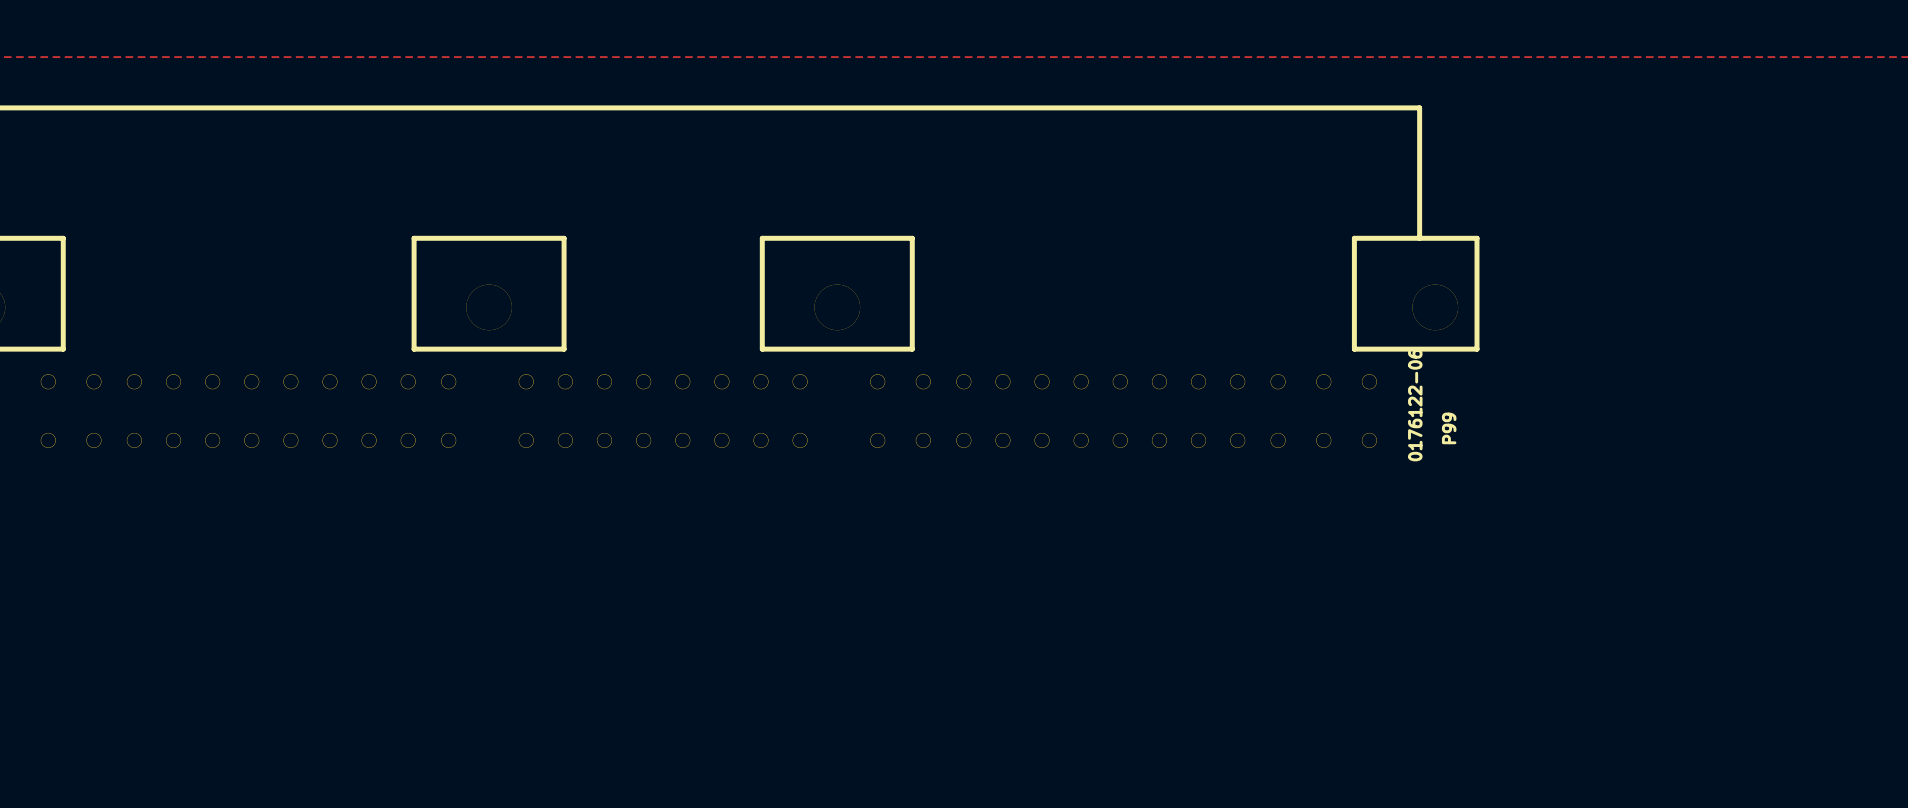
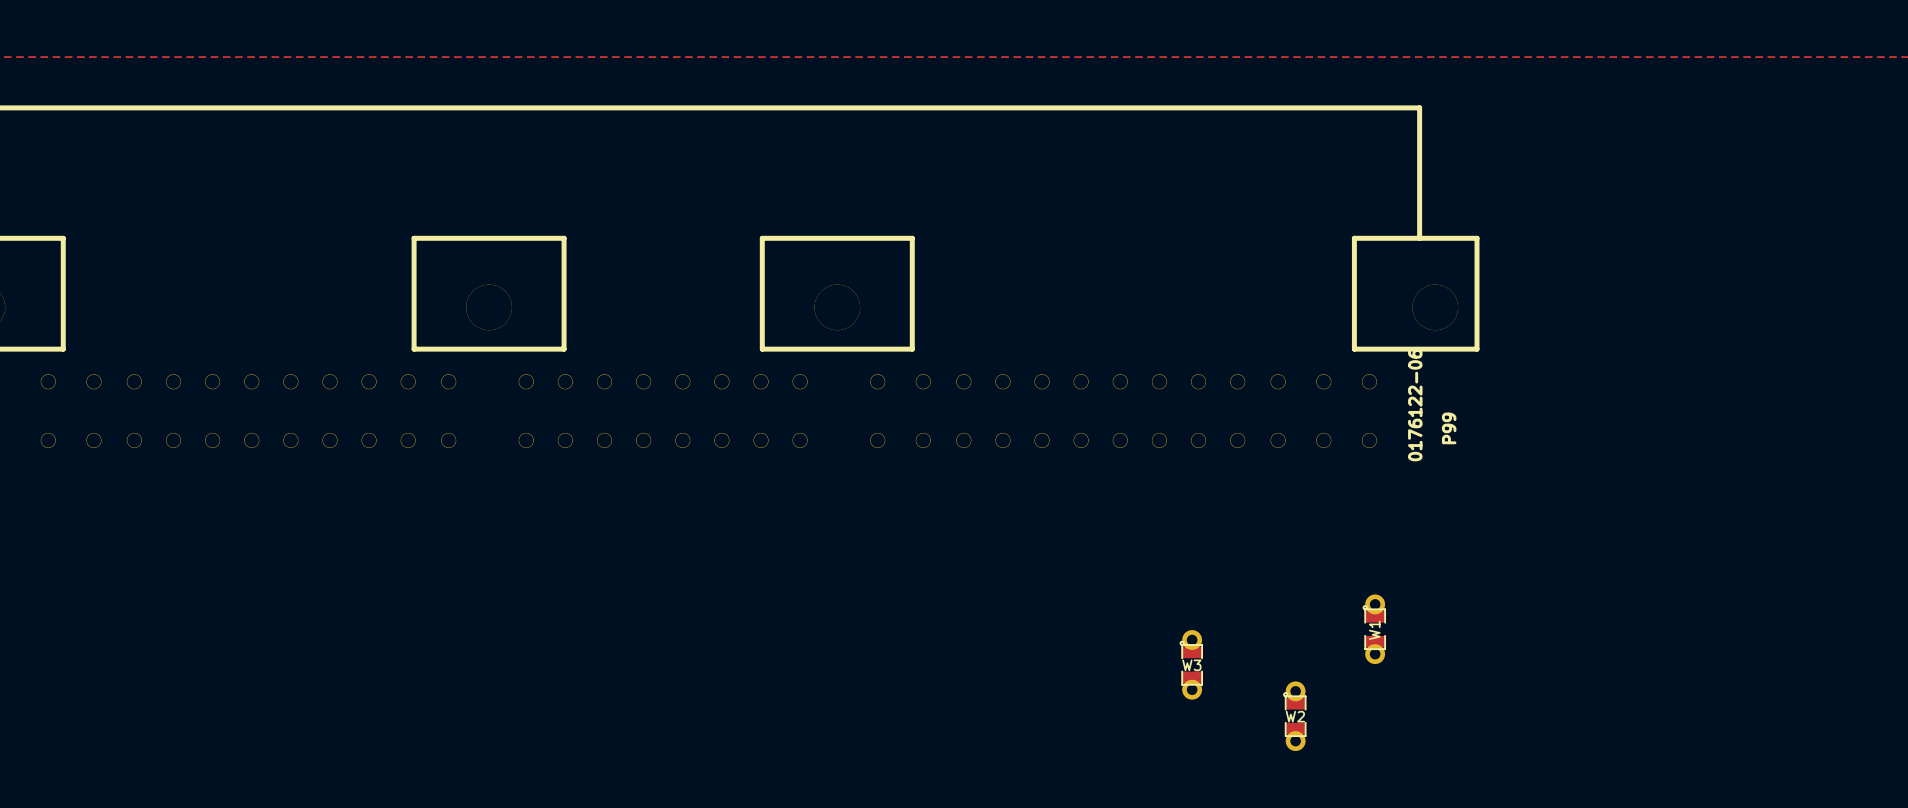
W1: none -> (1374, 629)
W3: none -> (1191, 664)
W2: none -> (1294, 716)

